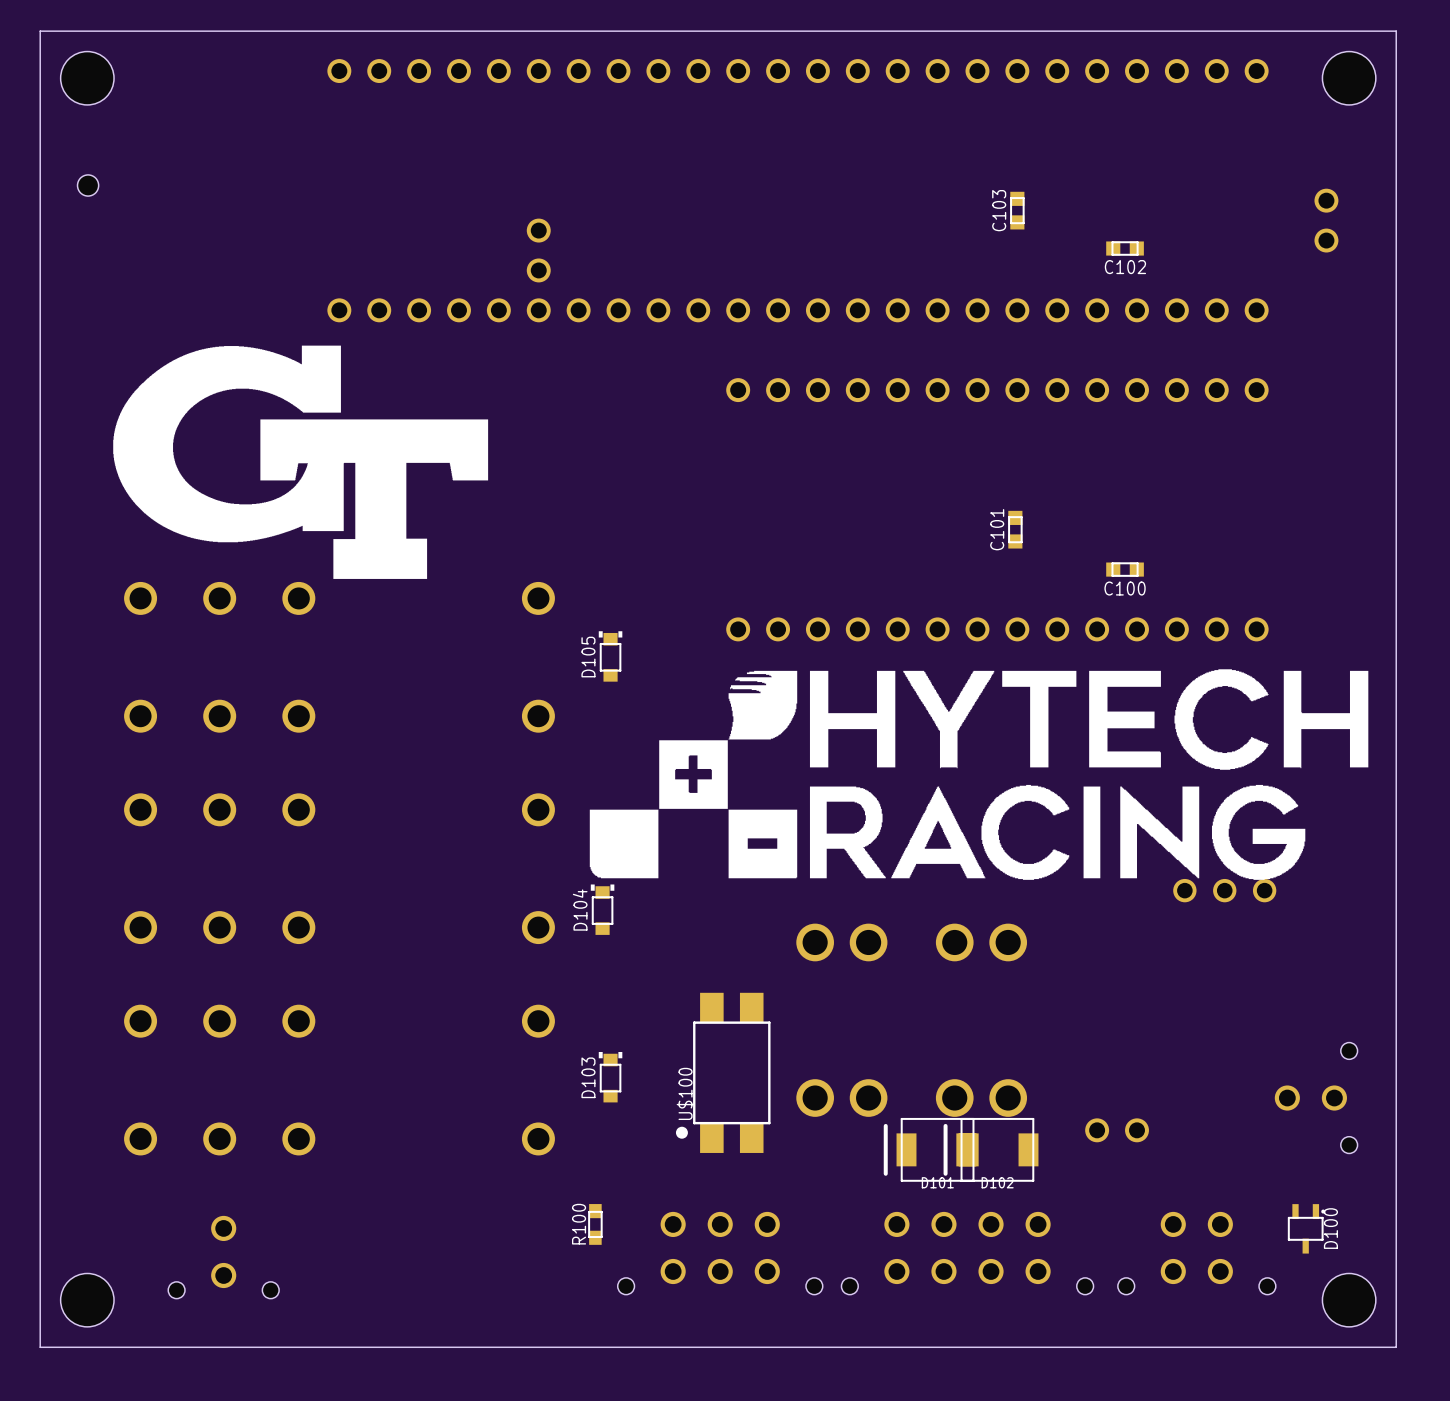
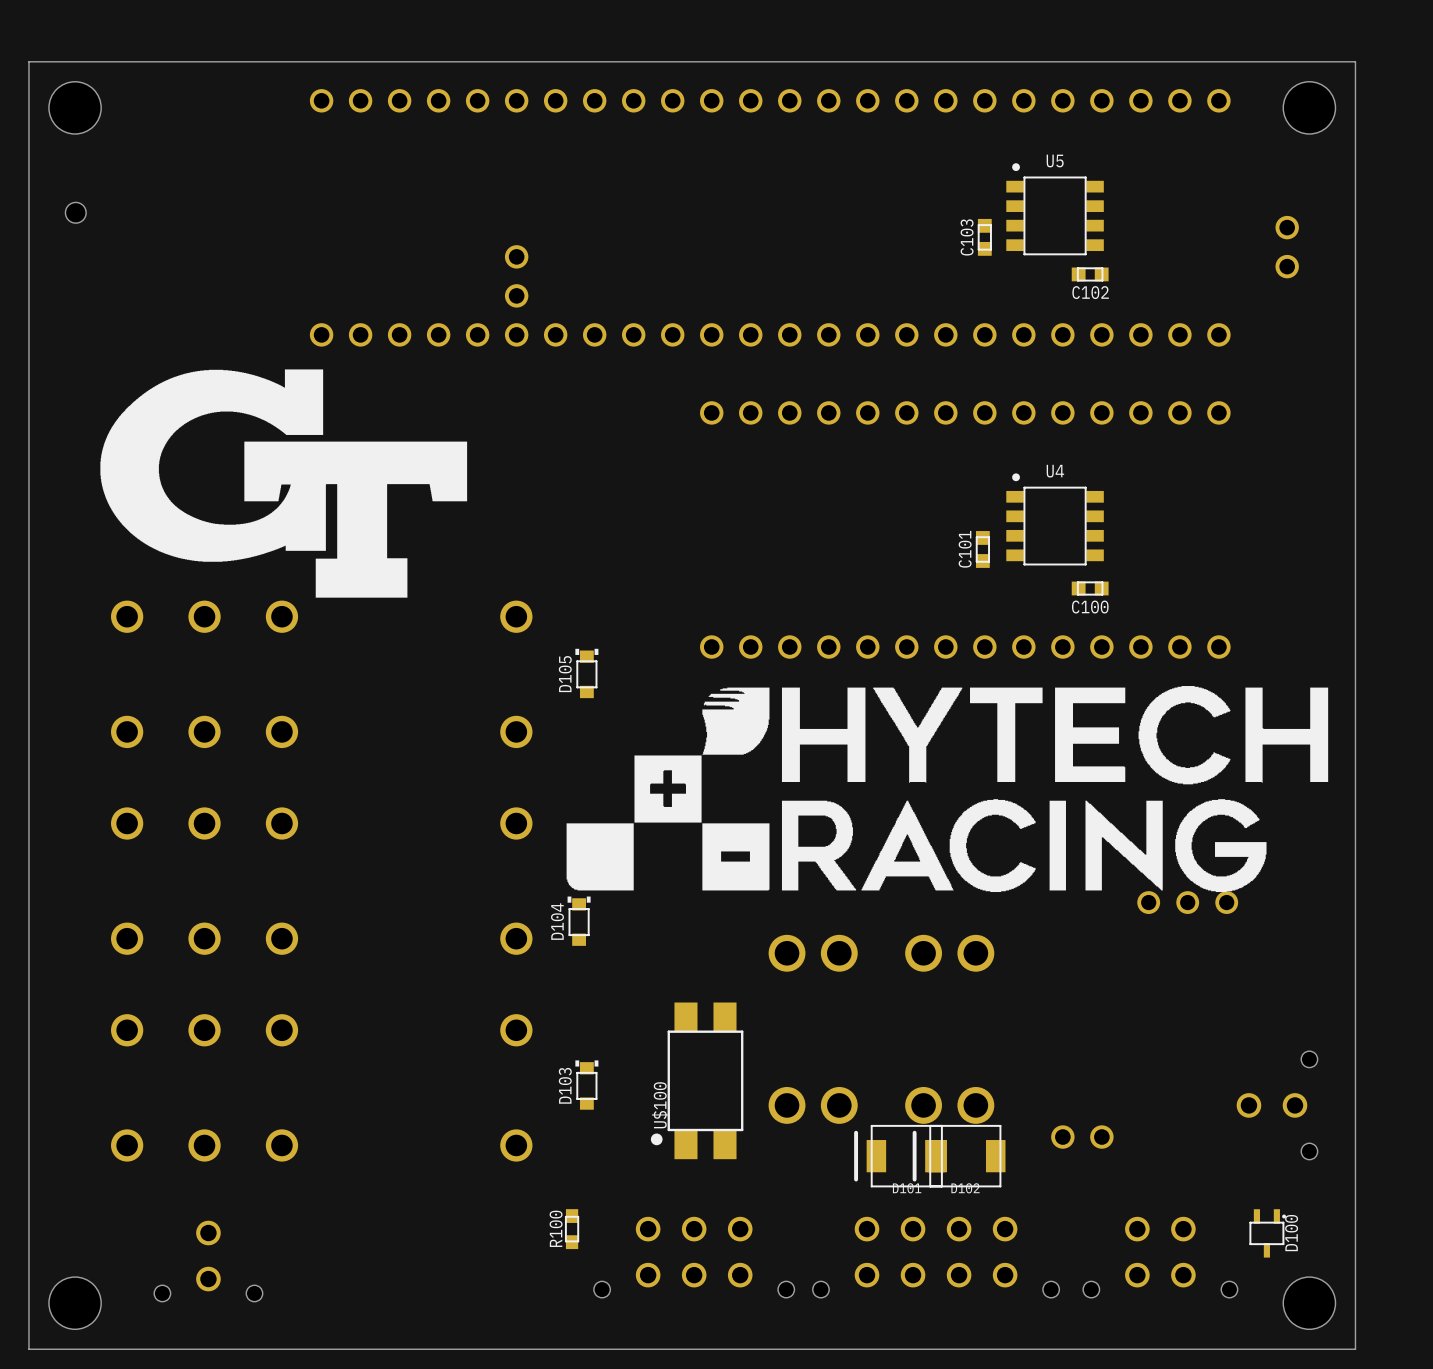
U5: none -> (1055, 209)
U4: none -> (1055, 519)

